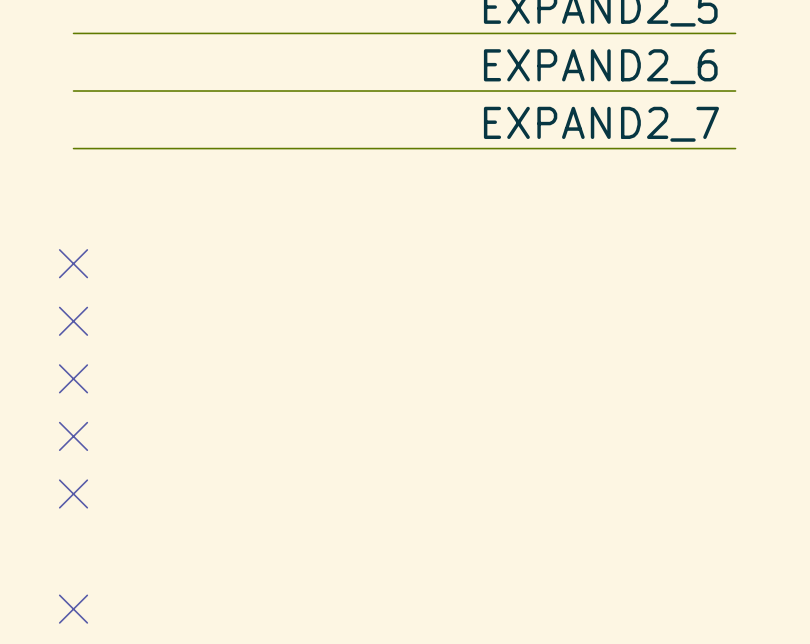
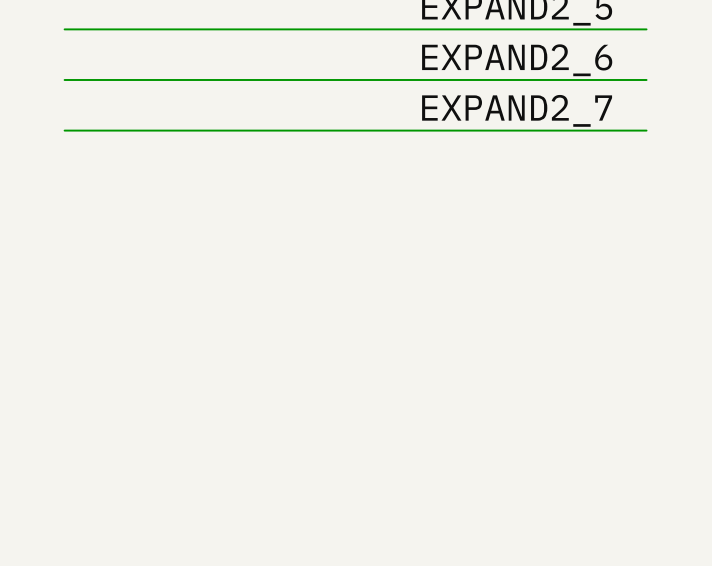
no-connect mark: (73, 263) -> none
no-connect mark: (73, 321) -> none
no-connect mark: (73, 378) -> none
no-connect mark: (73, 436) -> none
no-connect mark: (73, 493) -> none
no-connect mark: (73, 609) -> none

